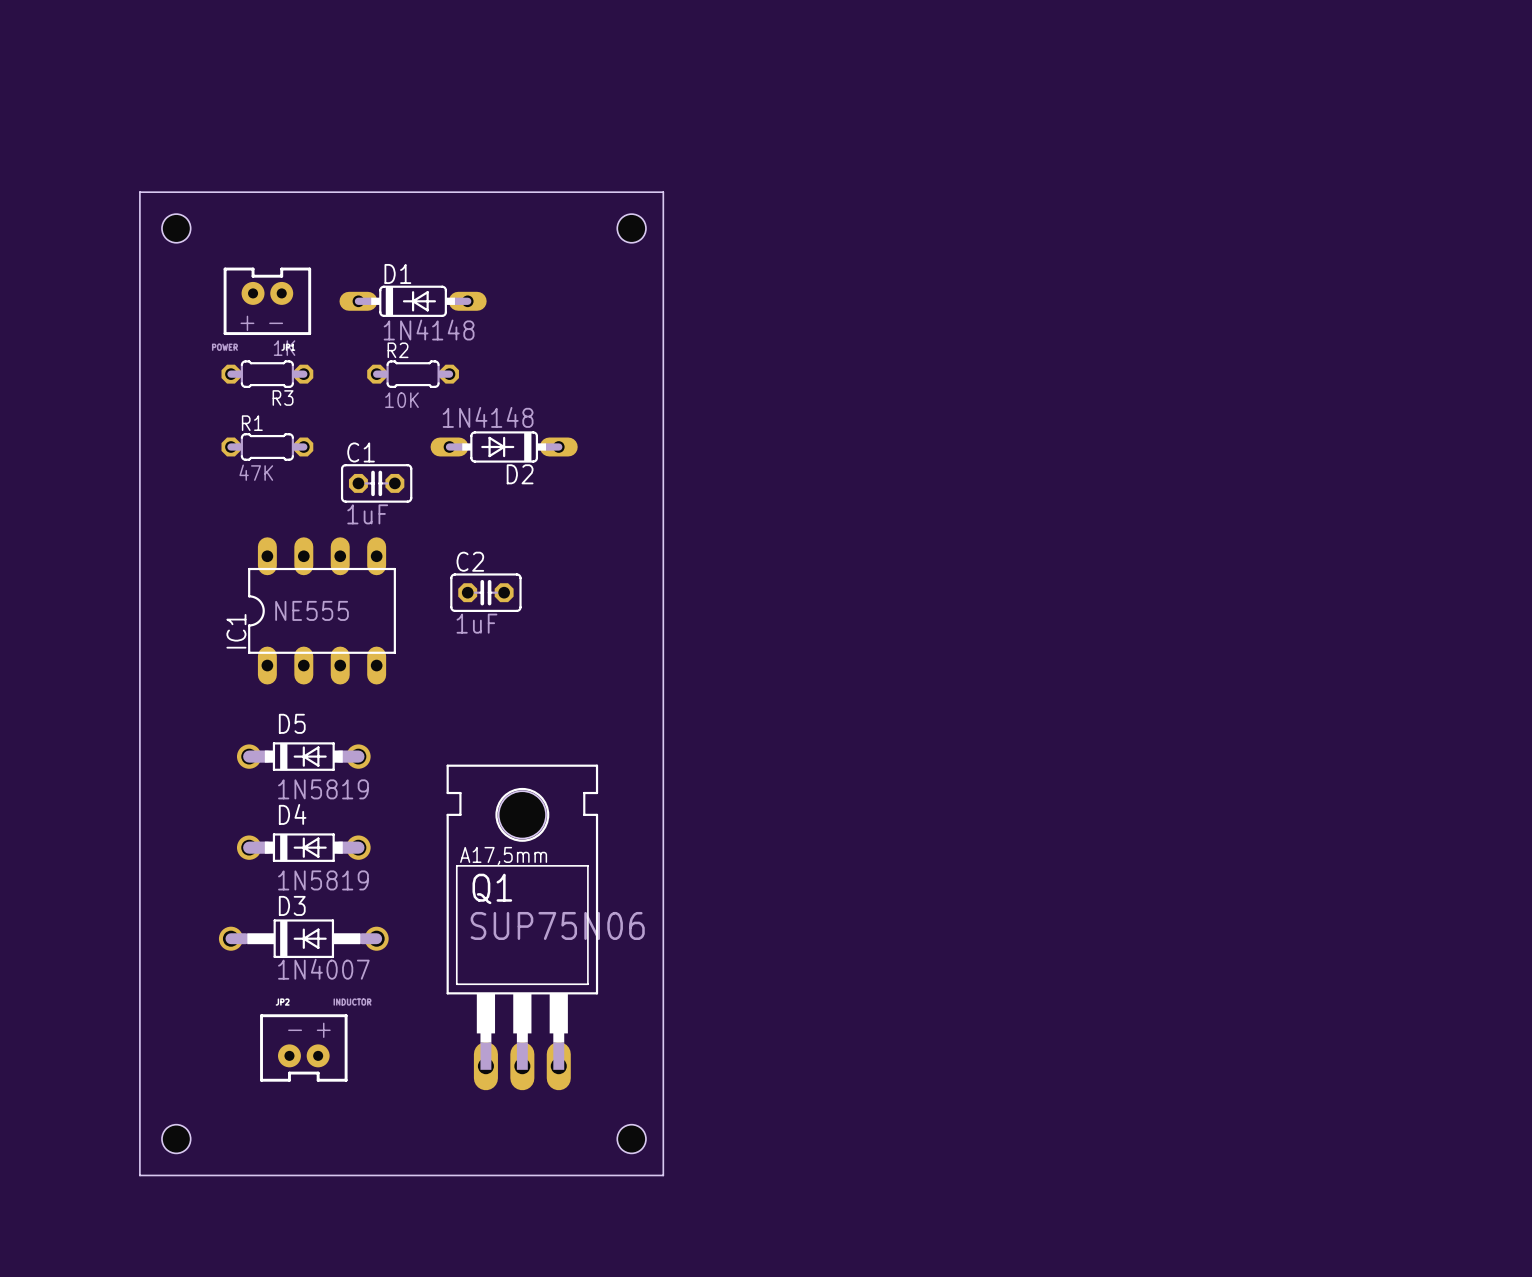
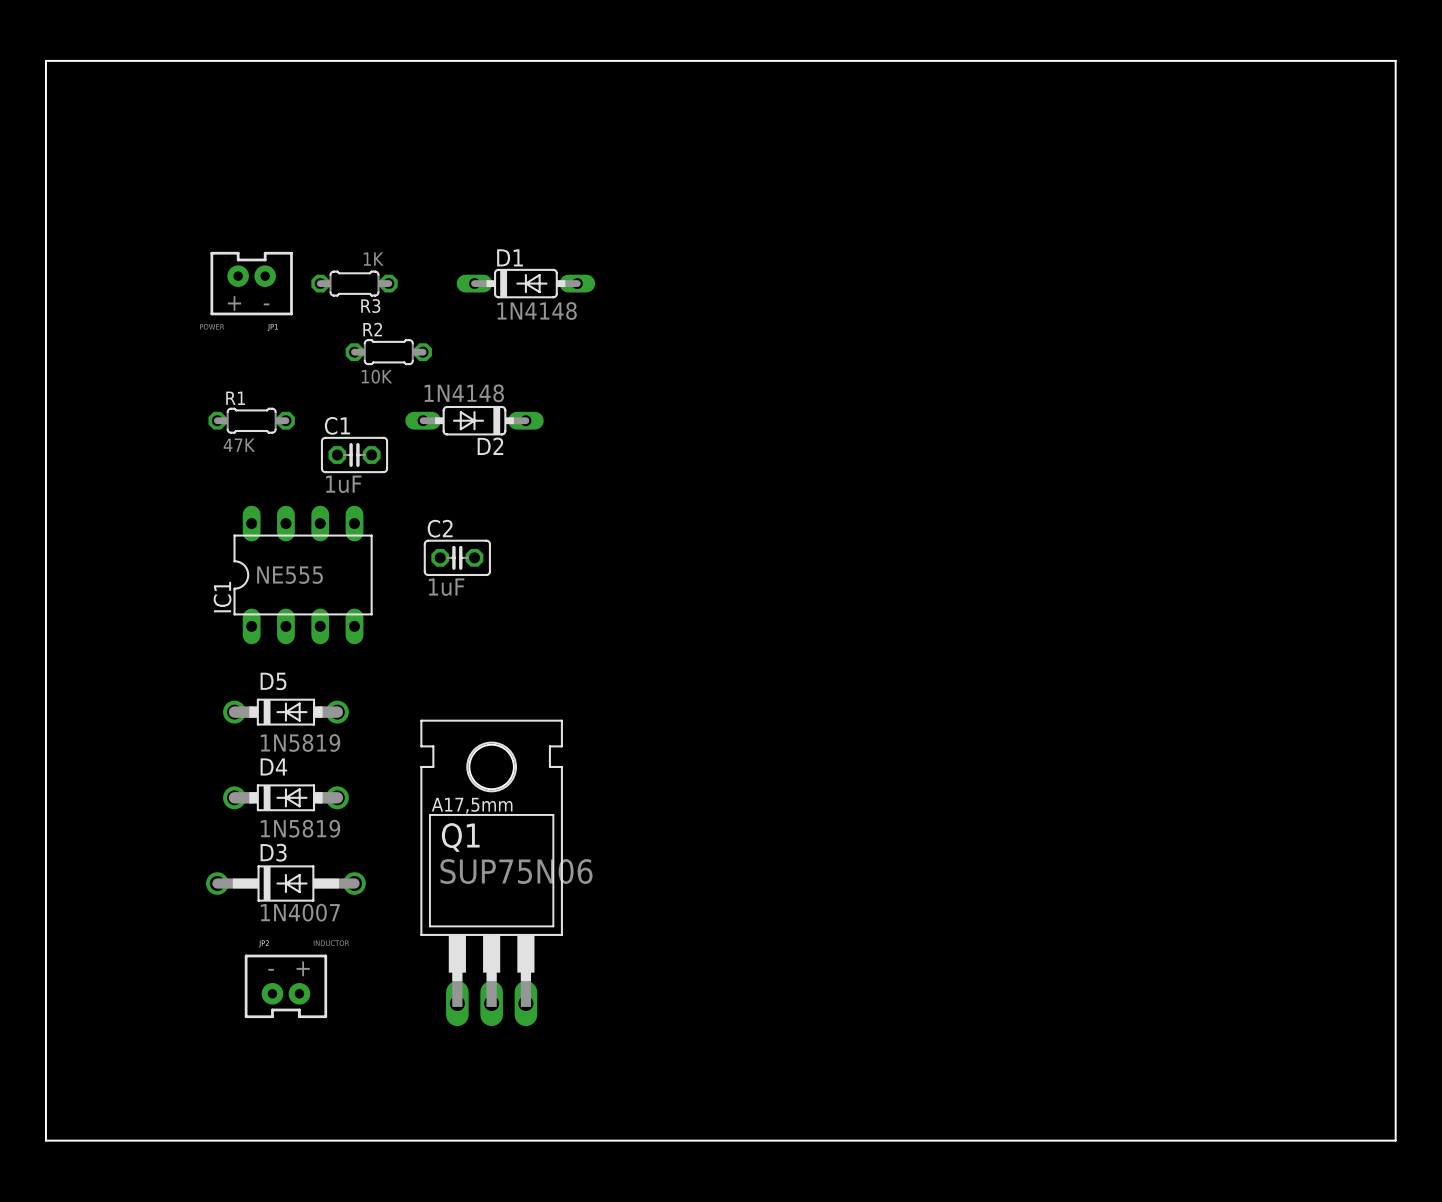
board edge: none -> (45, 60) (1395, 60) (1395, 1140) (45, 1140) (45, 60)
board edge: (139, 192) (663, 192) (663, 1175) (139, 1175) (139, 192) -> none
hole: (176, 228) -> none
hole: (631, 228) -> none
D1 position: (413, 301) -> (525, 283)
R3 position: (267, 374) -> (354, 283)
hole: (176, 1139) -> none
hole: (631, 1139) -> none

